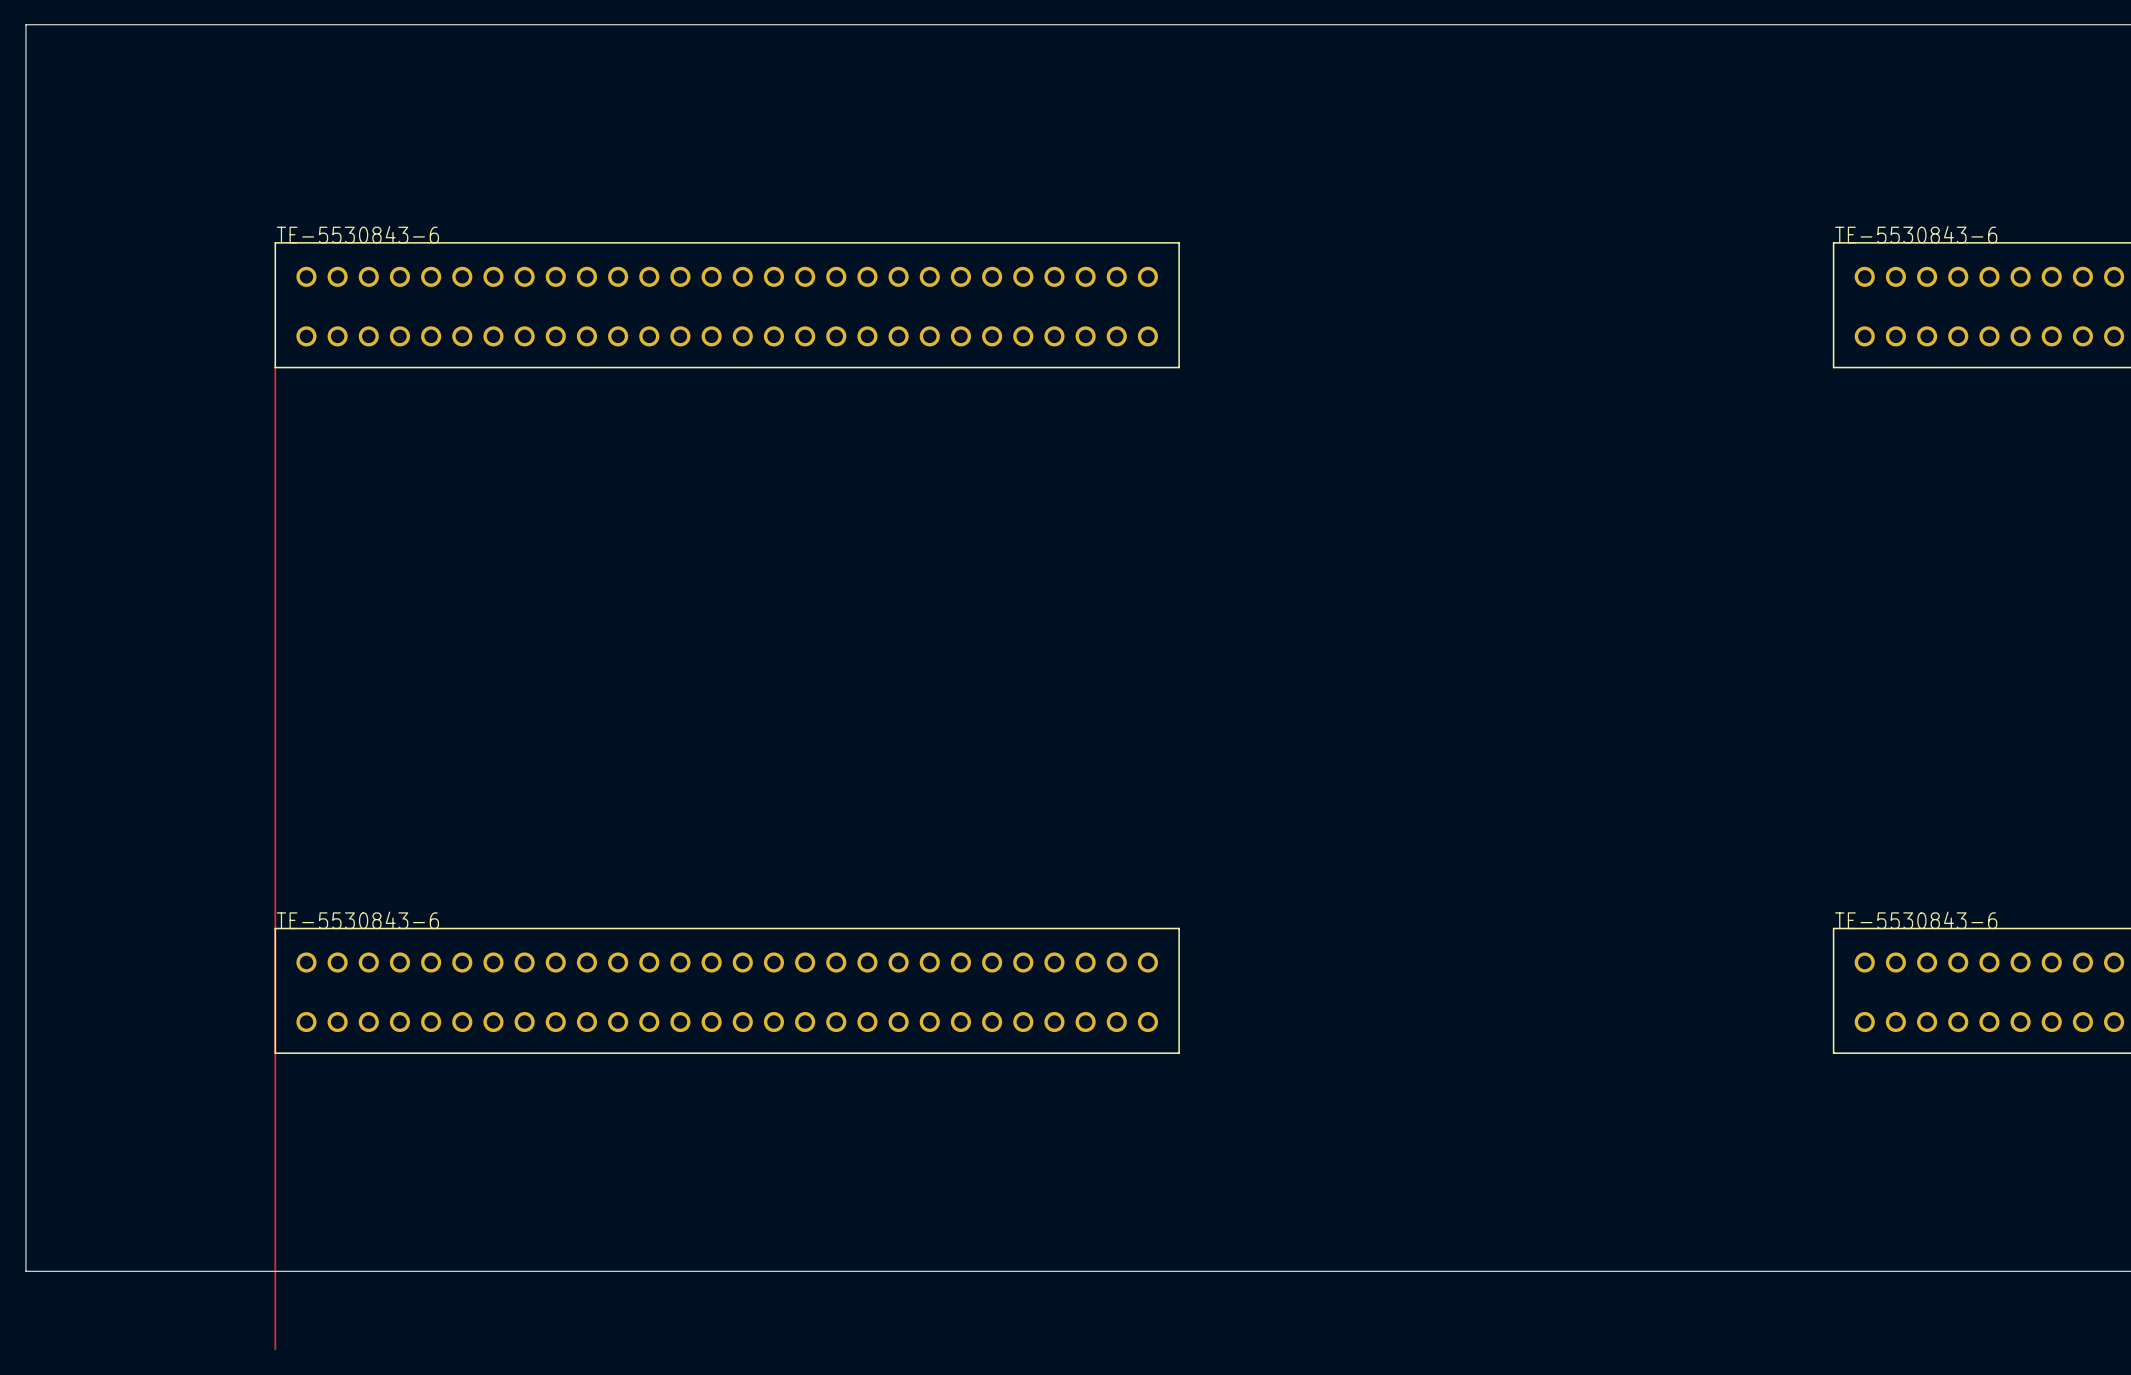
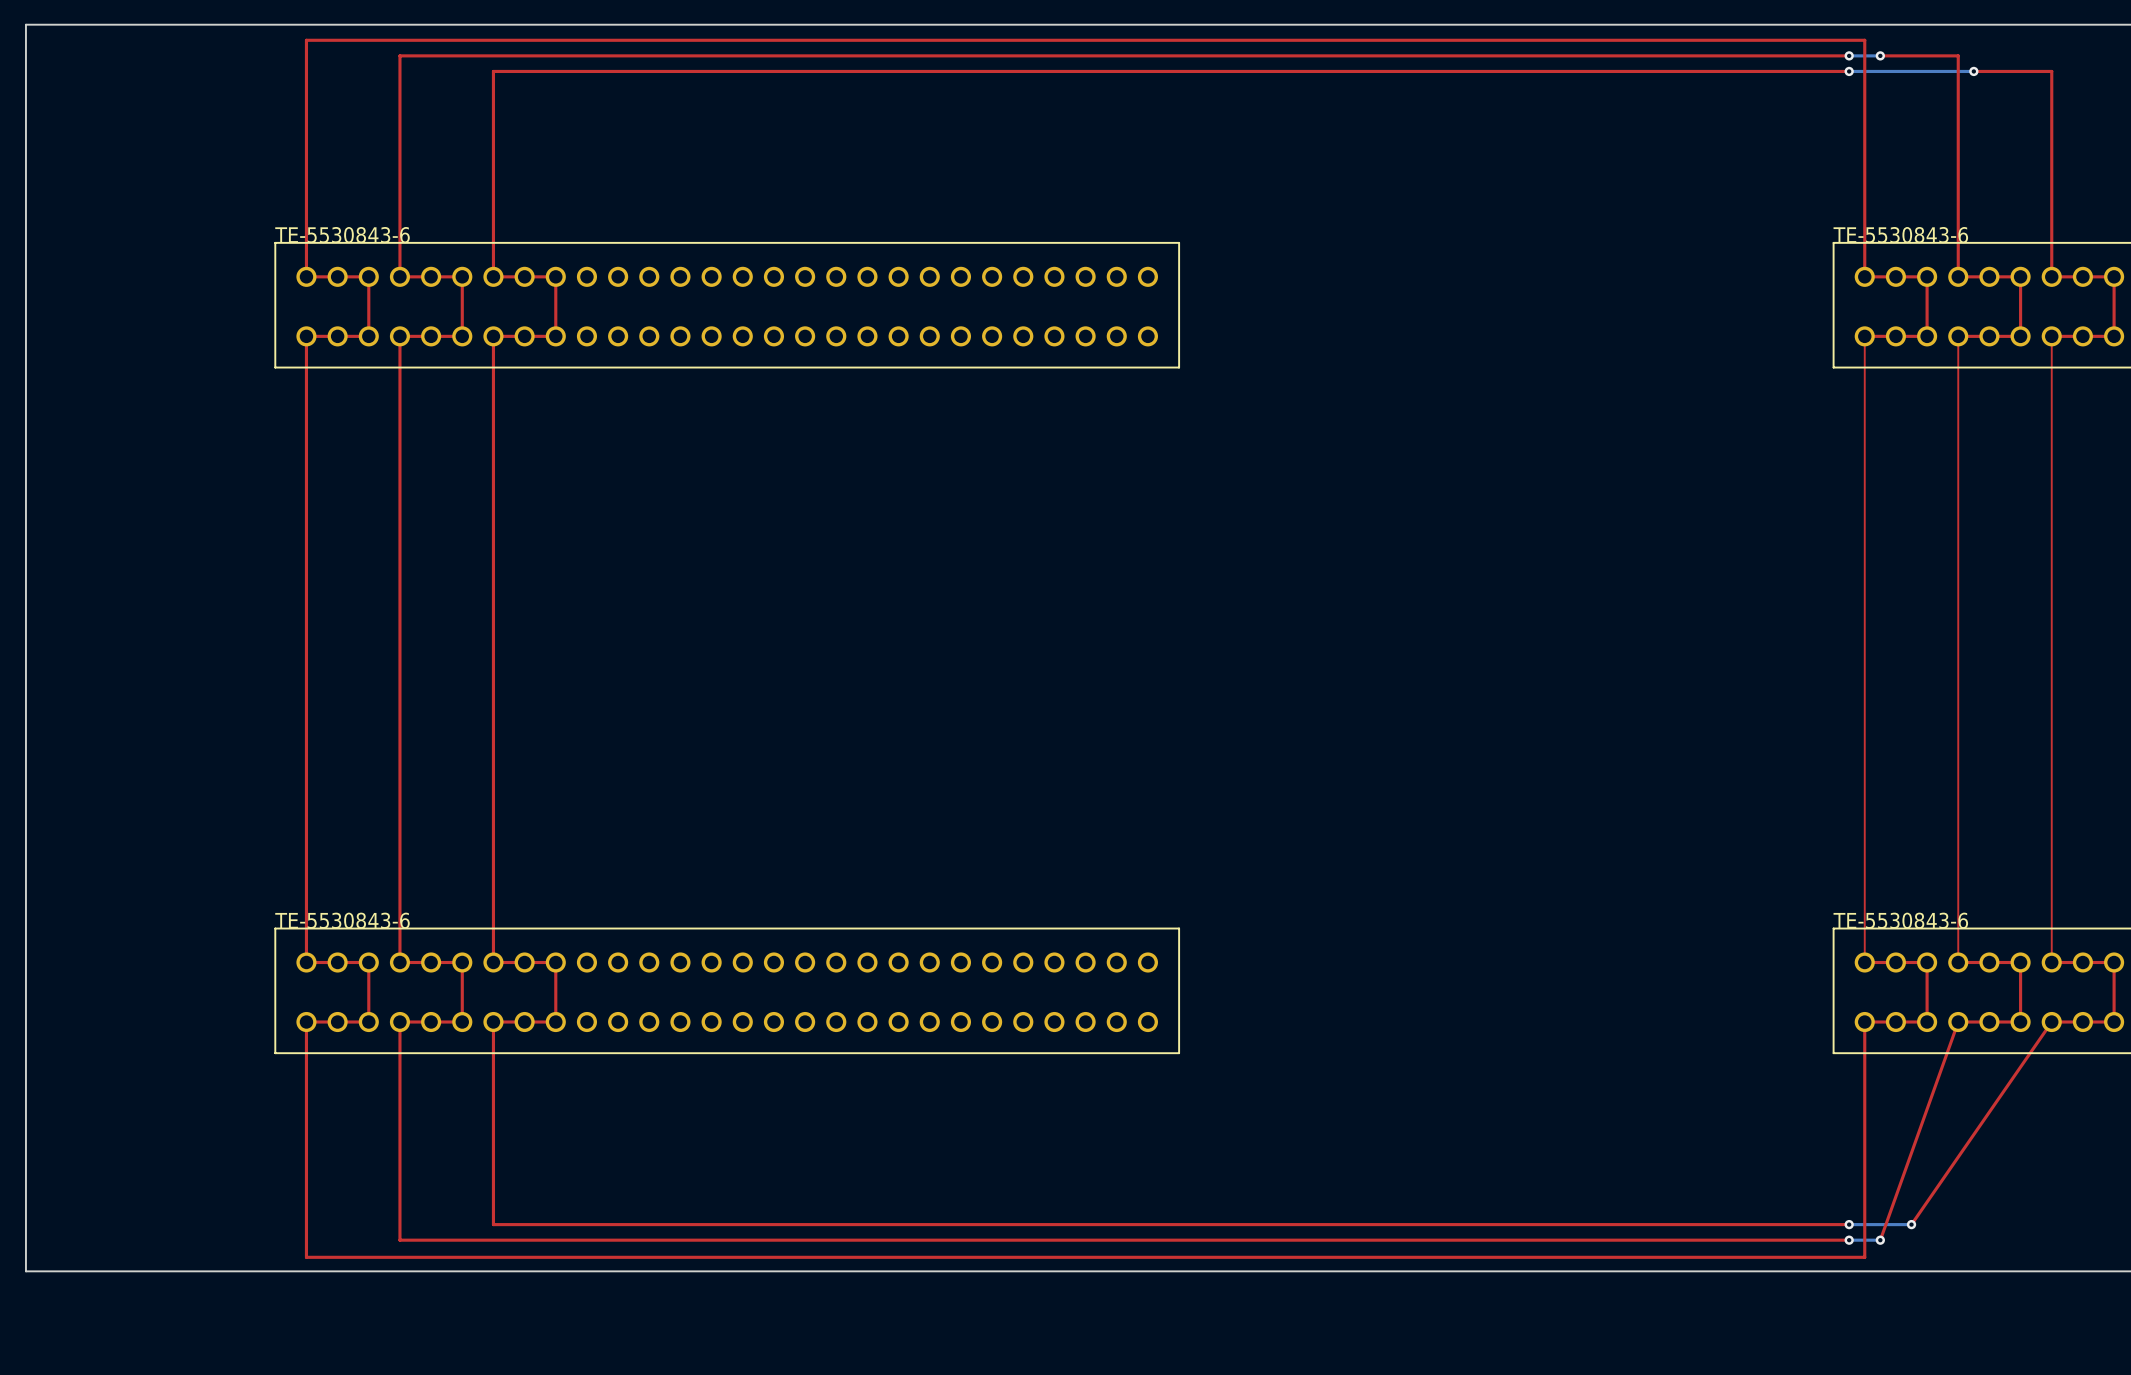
top track: none -> (306, 40) (306, 276) (368, 276) (368, 336) (306, 336) (306, 962) (368, 962) (368, 1022) (306, 1022) (306, 1257) (1864, 1257) (1864, 1022) (1927, 1022) (1927, 962) (1864, 962) (1864, 336) (1927, 336) (1927, 276) (1864, 276) (1864, 40) (306, 40)
top track: none -> (1849, 55) (399, 55) (399, 276) (462, 276) (462, 336) (399, 336) (399, 962) (462, 962) (462, 1022) (399, 1022) (399, 1240) (1849, 1240)
bottom track: none -> (1849, 55) (1880, 55)
via: none -> (1849, 55)
top track: none -> (1880, 55) (1958, 55) (1958, 276) (2020, 276) (2020, 336) (1958, 336) (1958, 962) (2020, 962) (2020, 1022) (1958, 1022) (1880, 1240)
via: none -> (1880, 55)
top track: none -> (1849, 71) (493, 71) (493, 276) (555, 276) (555, 336) (493, 336) (493, 962) (555, 962) (555, 1022) (493, 1022) (493, 1224) (1849, 1224)
bottom track: none -> (1849, 71) (1973, 71)
via: none -> (1849, 71)
top track: none -> (1973, 71) (2051, 71) (2051, 276) (2114, 276) (2114, 336) (2051, 336) (2051, 962) (2114, 962) (2114, 1022) (2051, 1022) (1911, 1224)
via: none -> (1973, 71)
top track: (275, 367) (275, 1349) -> none
bottom track: none -> (1849, 1224) (1911, 1224)
via: none -> (1849, 1224)
via: none -> (1911, 1224)
bottom track: none -> (1849, 1240) (1880, 1240)
via: none -> (1849, 1240)
via: none -> (1880, 1240)

